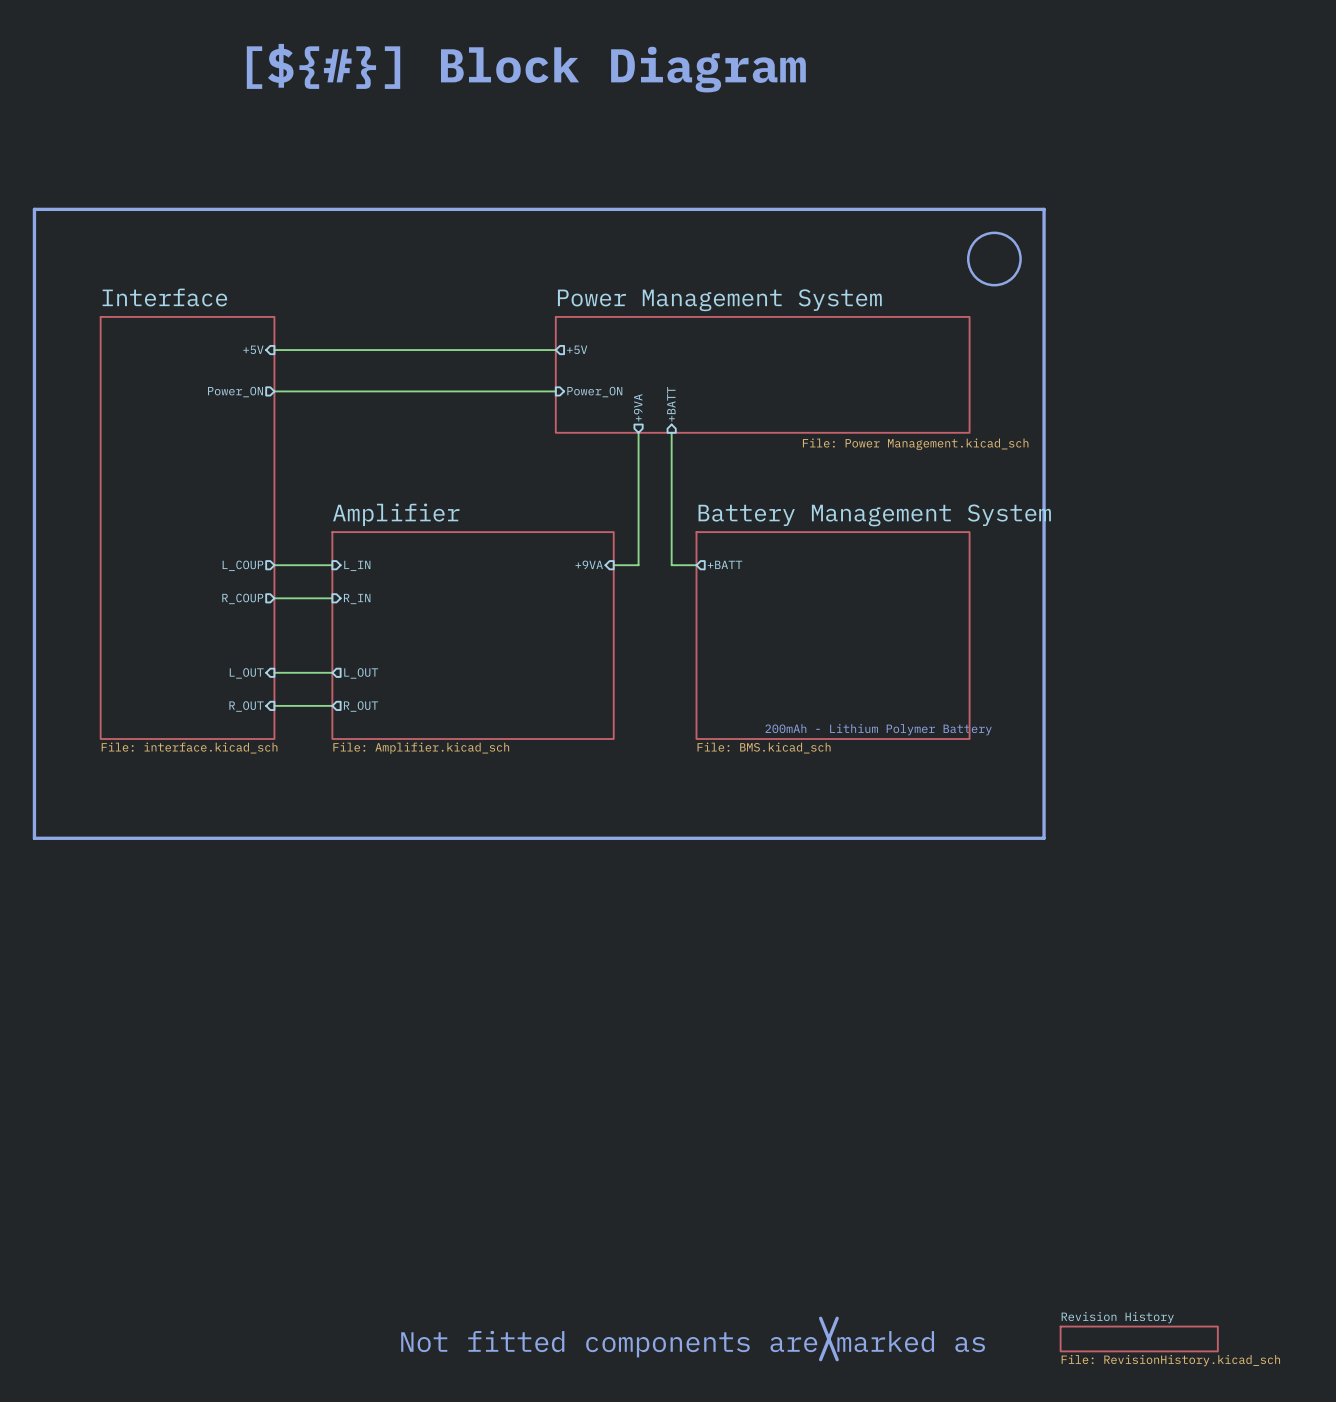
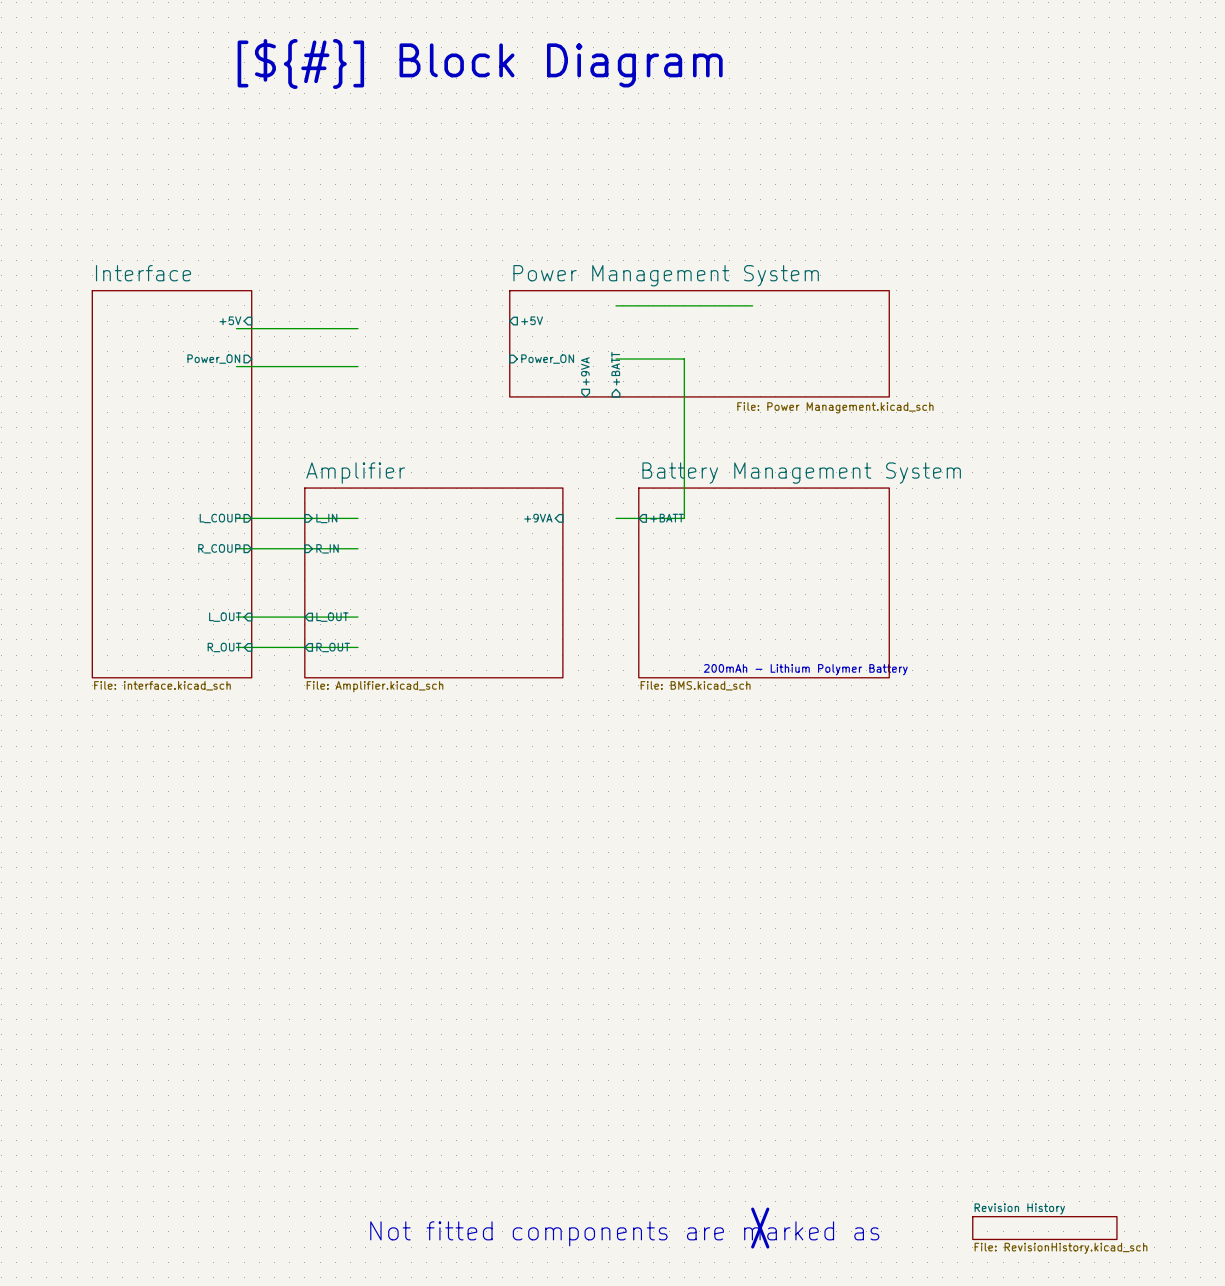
line: (34, 209) (1044, 209) (1044, 838) (34, 838) (34, 209) -> none
drawing: [966, 231, 1022, 287] -> none
wire: none -> (616, 305) (752, 305)
wire: (274, 350) (555, 350) -> none
wire: none -> (236, 328) (357, 328)
wire: (274, 391) (555, 391) -> none
wire: none -> (616, 359) (684, 359) (684, 518) (638, 518)
wire: none -> (236, 366) (357, 366)
wire: (638, 432) (638, 565) (613, 565) -> none
wire: (671, 432) (671, 565) -> none
wire: none -> (236, 518) (251, 518)
wire: none -> (304, 518) (357, 518)
wire: none -> (236, 548) (251, 548)
wire: none -> (304, 548) (357, 548)
wire: none -> (236, 617) (251, 617)
wire: none -> (304, 617) (357, 617)
wire: none -> (236, 647) (251, 647)
wire: none -> (304, 647) (357, 647)

